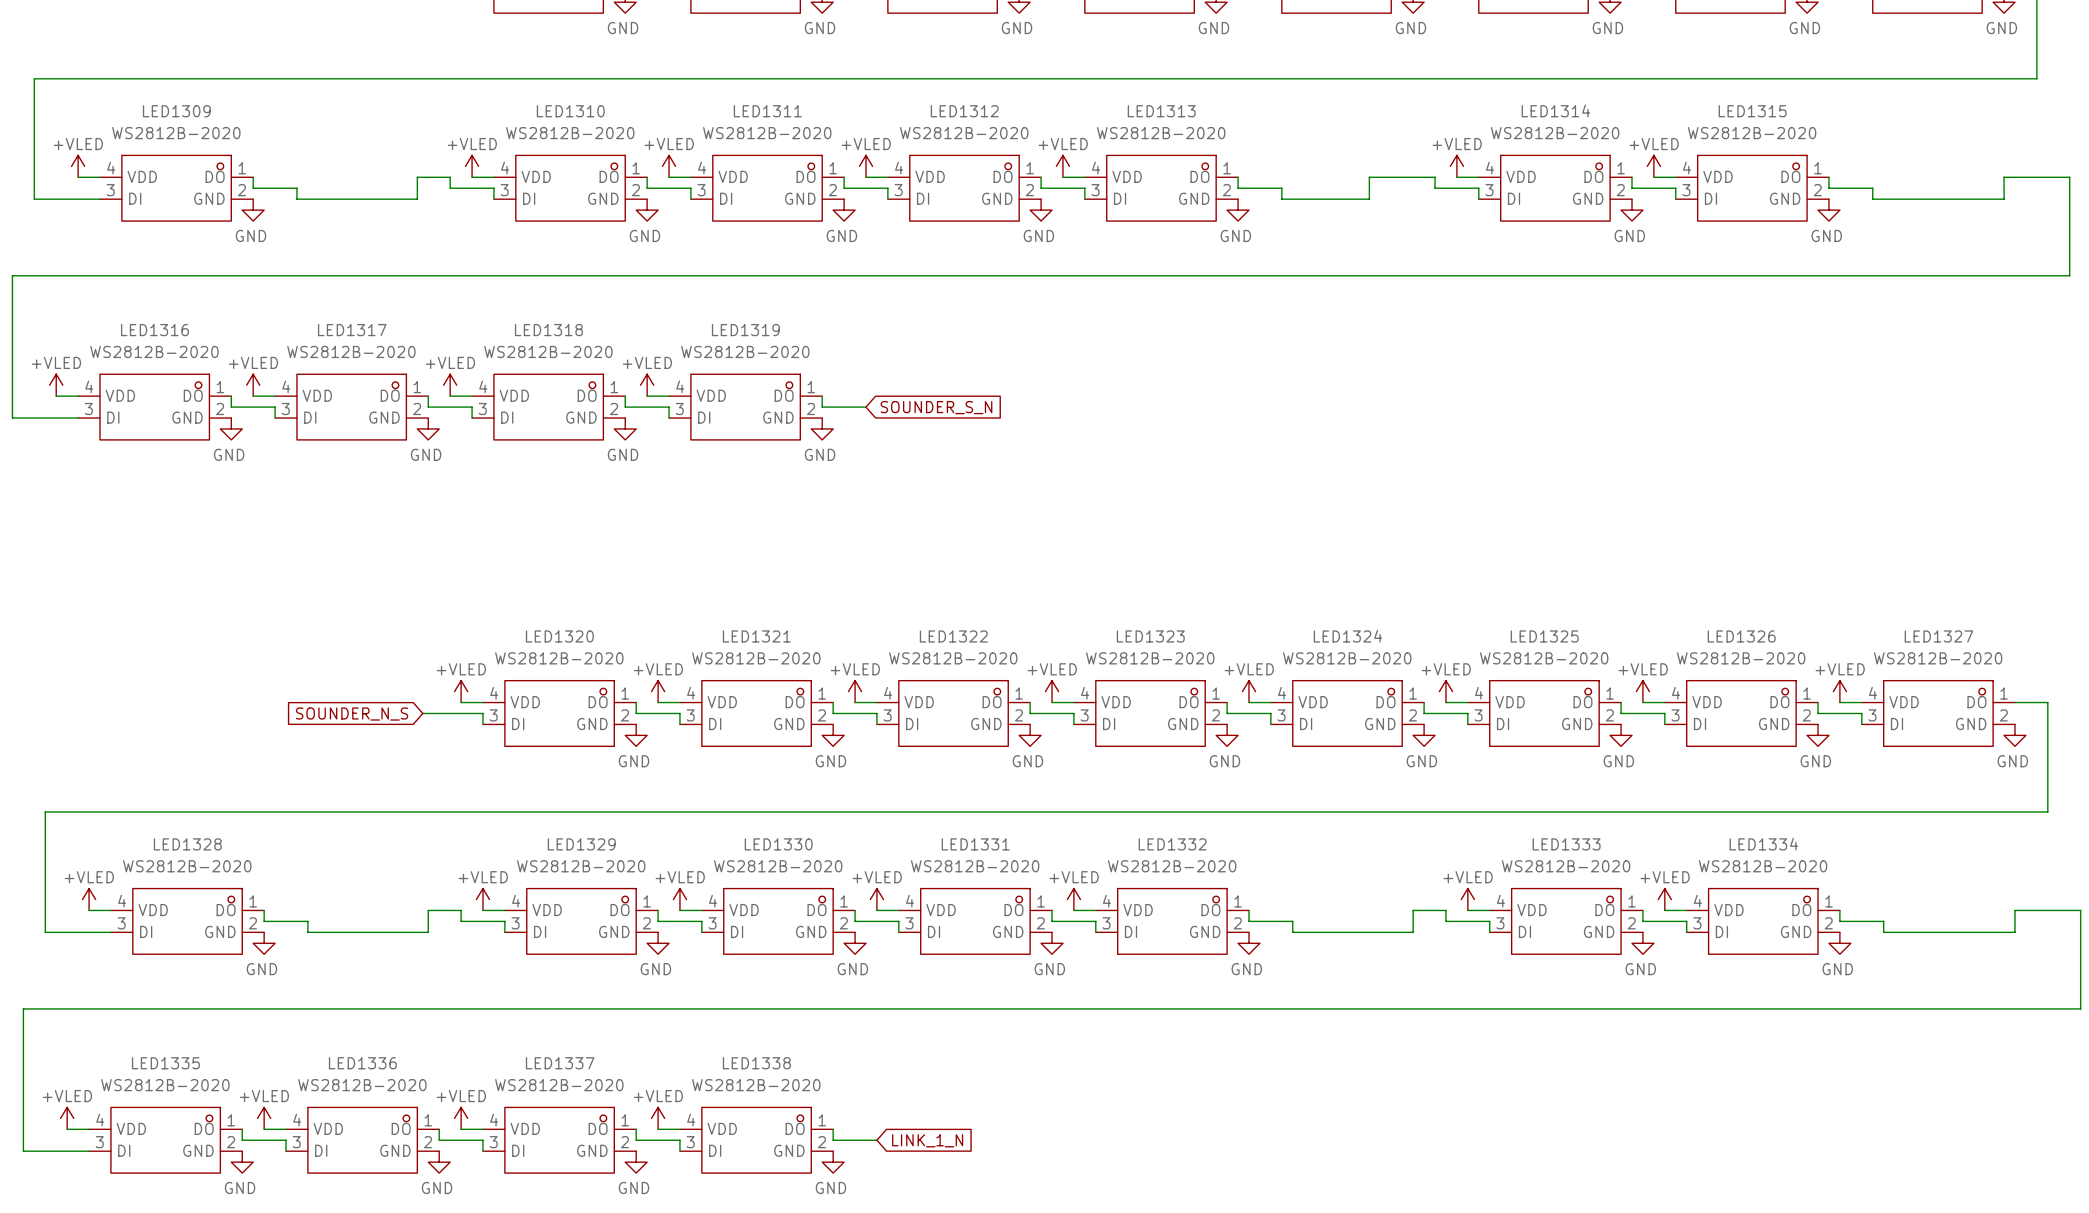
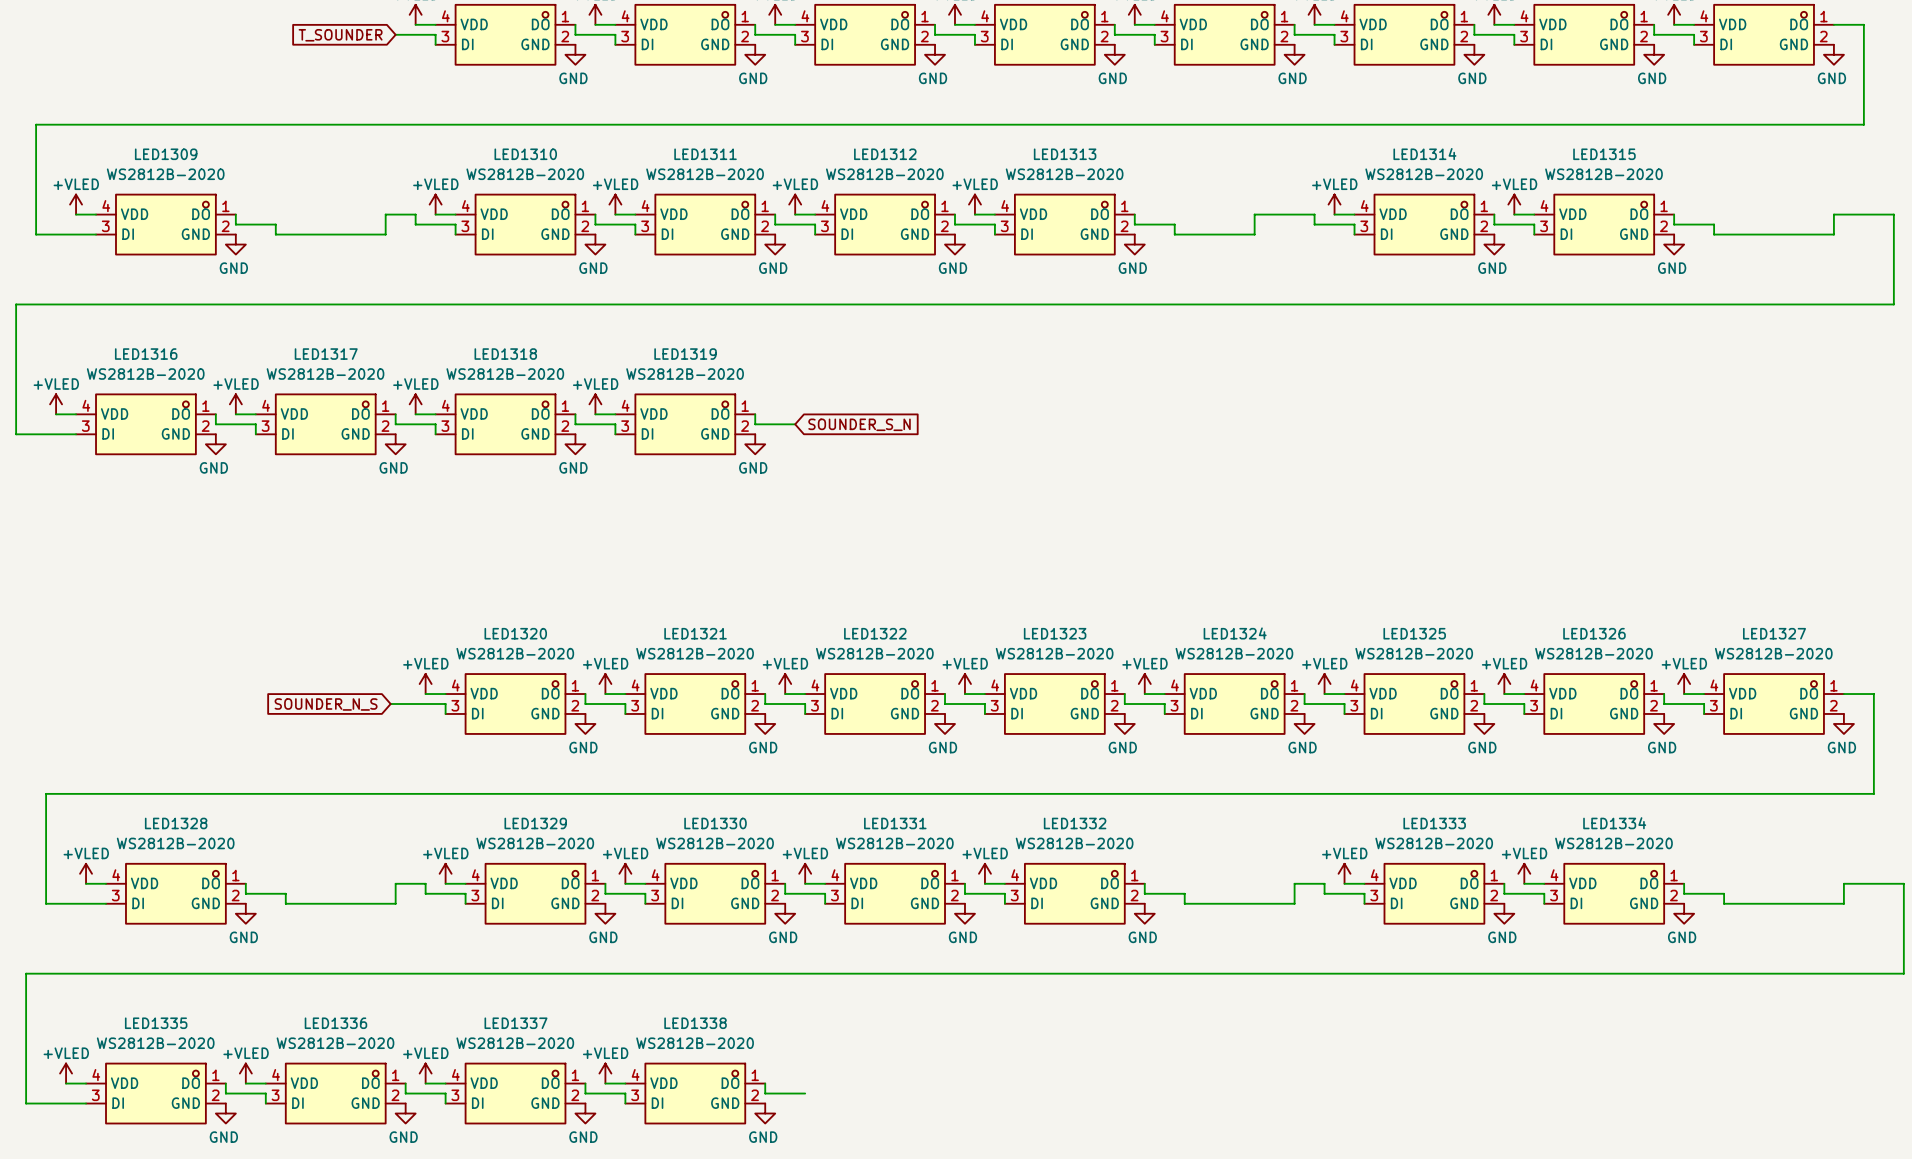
global label: LINK_1_N (927, 1140) -> none

